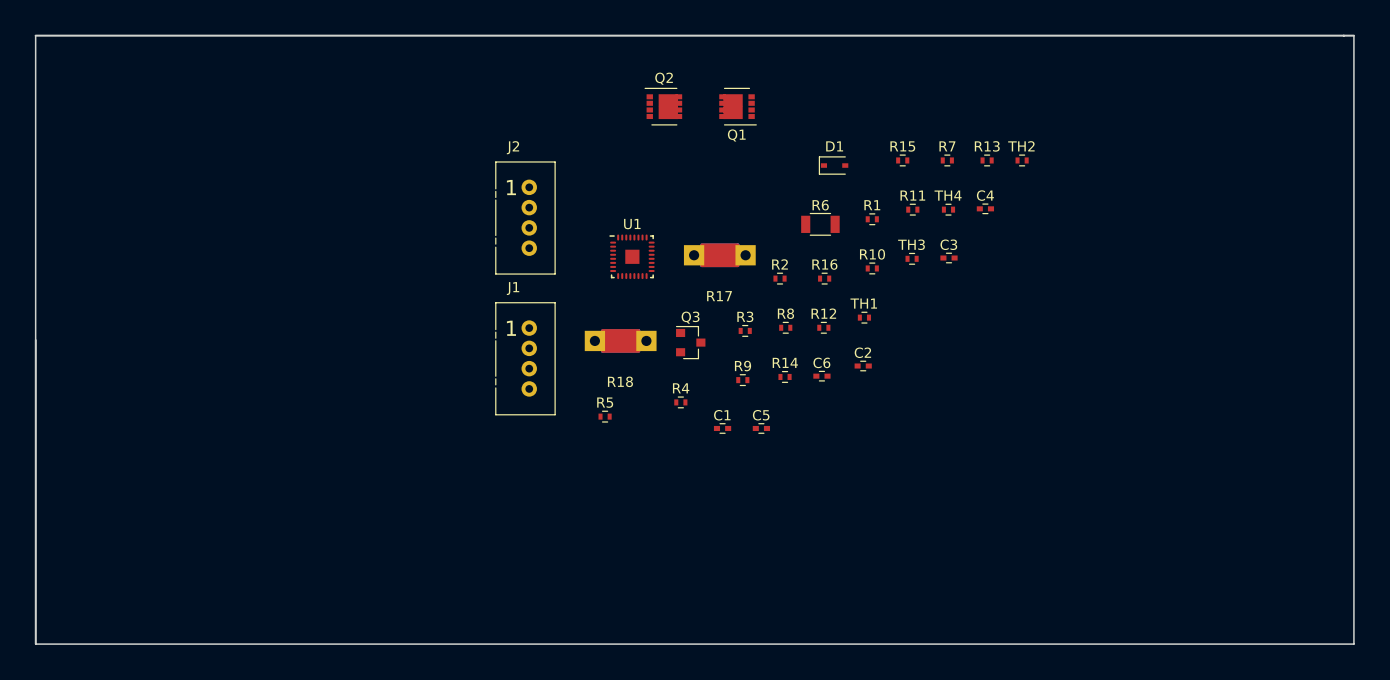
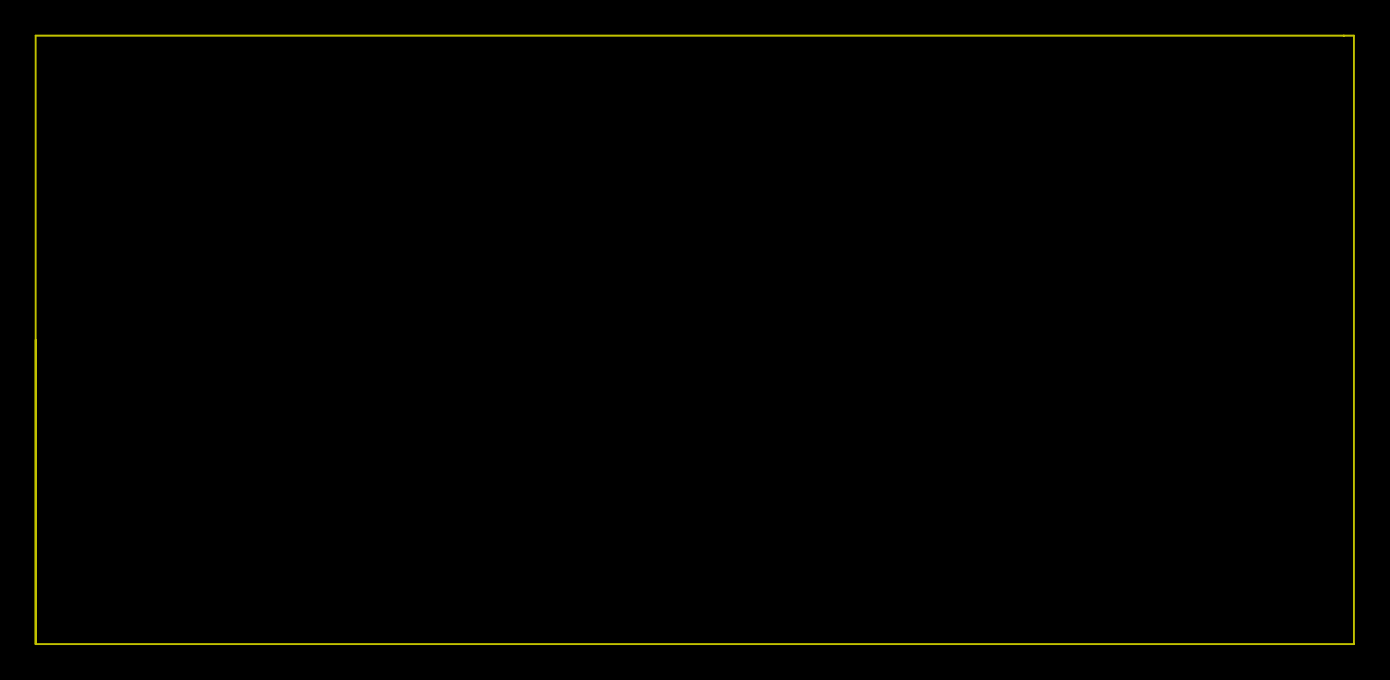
Q2: (663, 106) -> none
Q1: (738, 106) -> none
R15: (902, 160) -> none
R7: (947, 160) -> none
R13: (987, 160) -> none
TH2: (1022, 160) -> none
D1: (833, 165) -> none
C4: (985, 208) -> none
R11: (912, 209) -> none
TH4: (948, 209) -> none
J2: (525, 218) -> none
R1: (872, 219) -> none
R6: (820, 224) -> none
R17: (719, 255) -> none
U1: (631, 256) -> none
TH3: (912, 258) -> none
C3: (949, 258) -> none
R10: (872, 268) -> none
R2: (780, 278) -> none
R16: (824, 278) -> none
TH1: (864, 317) -> none
R8: (785, 327) -> none
R12: (823, 327) -> none
R3: (745, 330) -> none
R18: (620, 340) -> none
Q3: (690, 342) -> none
J1: (525, 358) -> none
C2: (863, 366) -> none
R14: (785, 376) -> none
C6: (821, 376) -> none
R9: (742, 380) -> none
R4: (680, 402) -> none
R5: (605, 416) -> none
C1: (722, 428) -> none
C5: (761, 428) -> none

